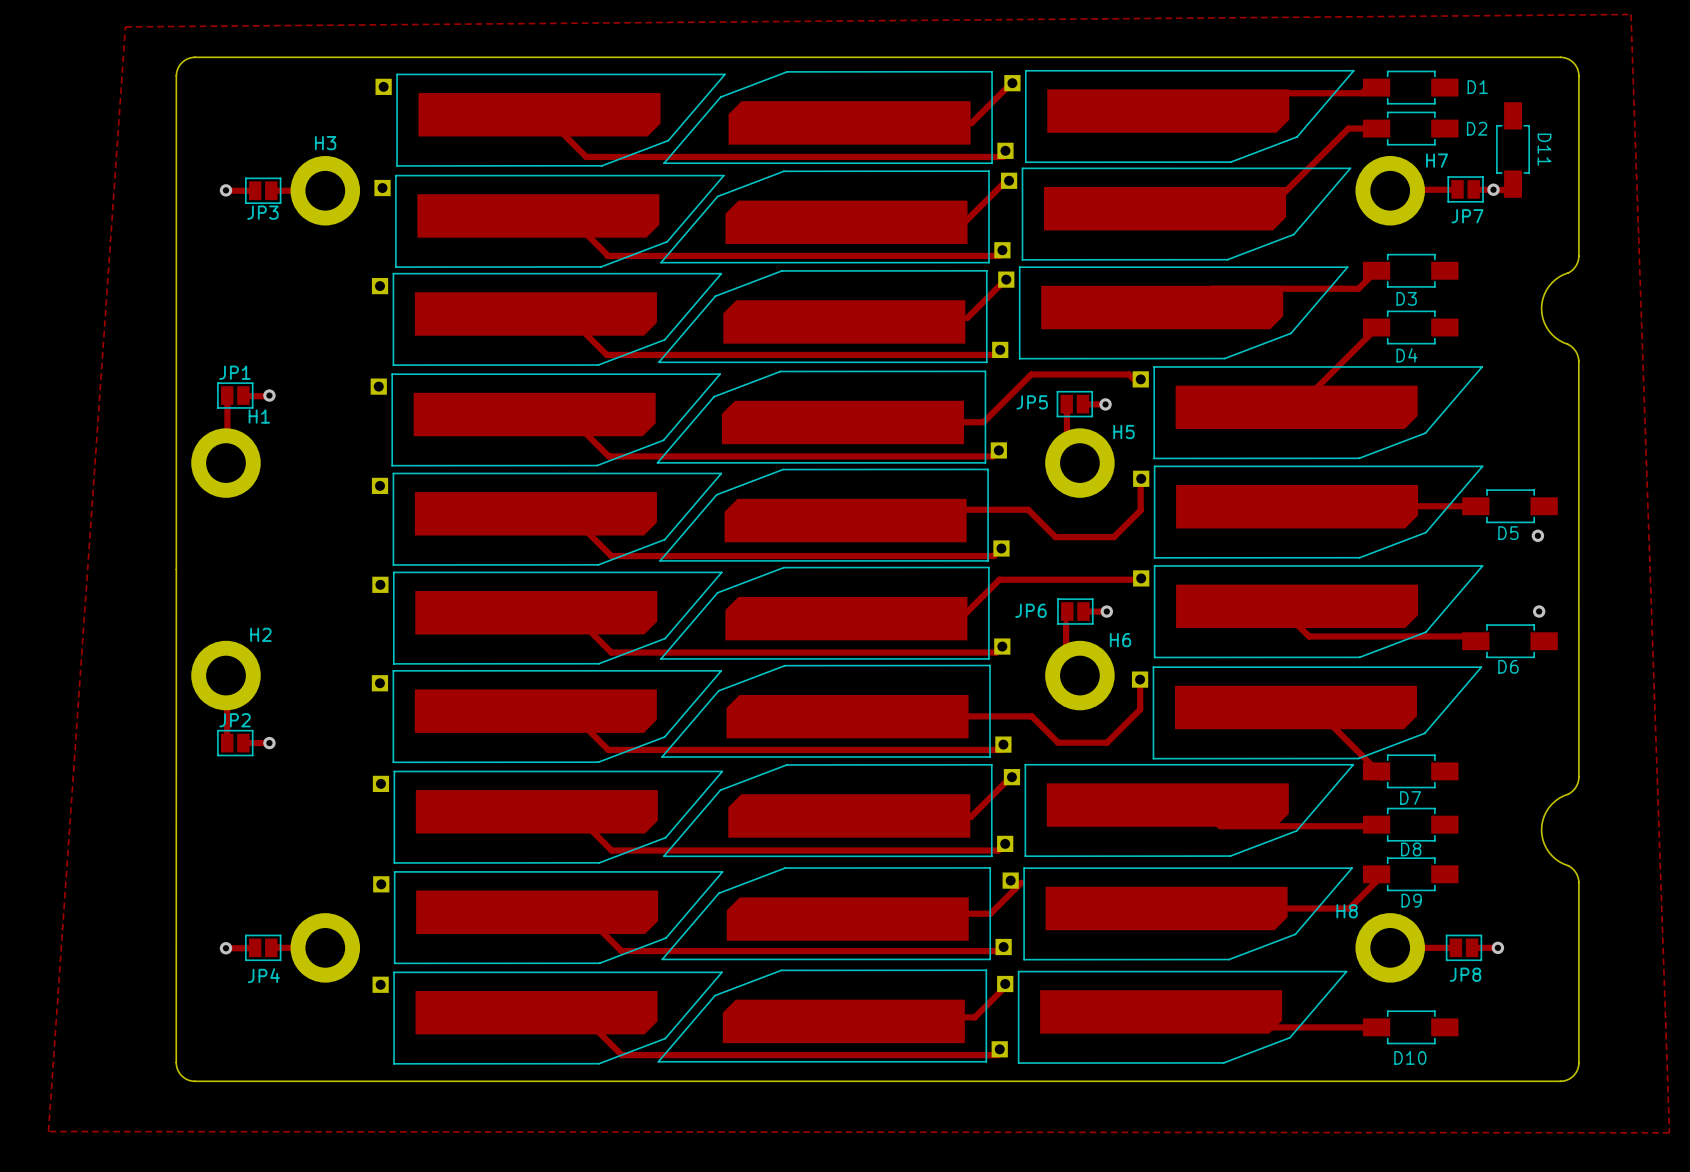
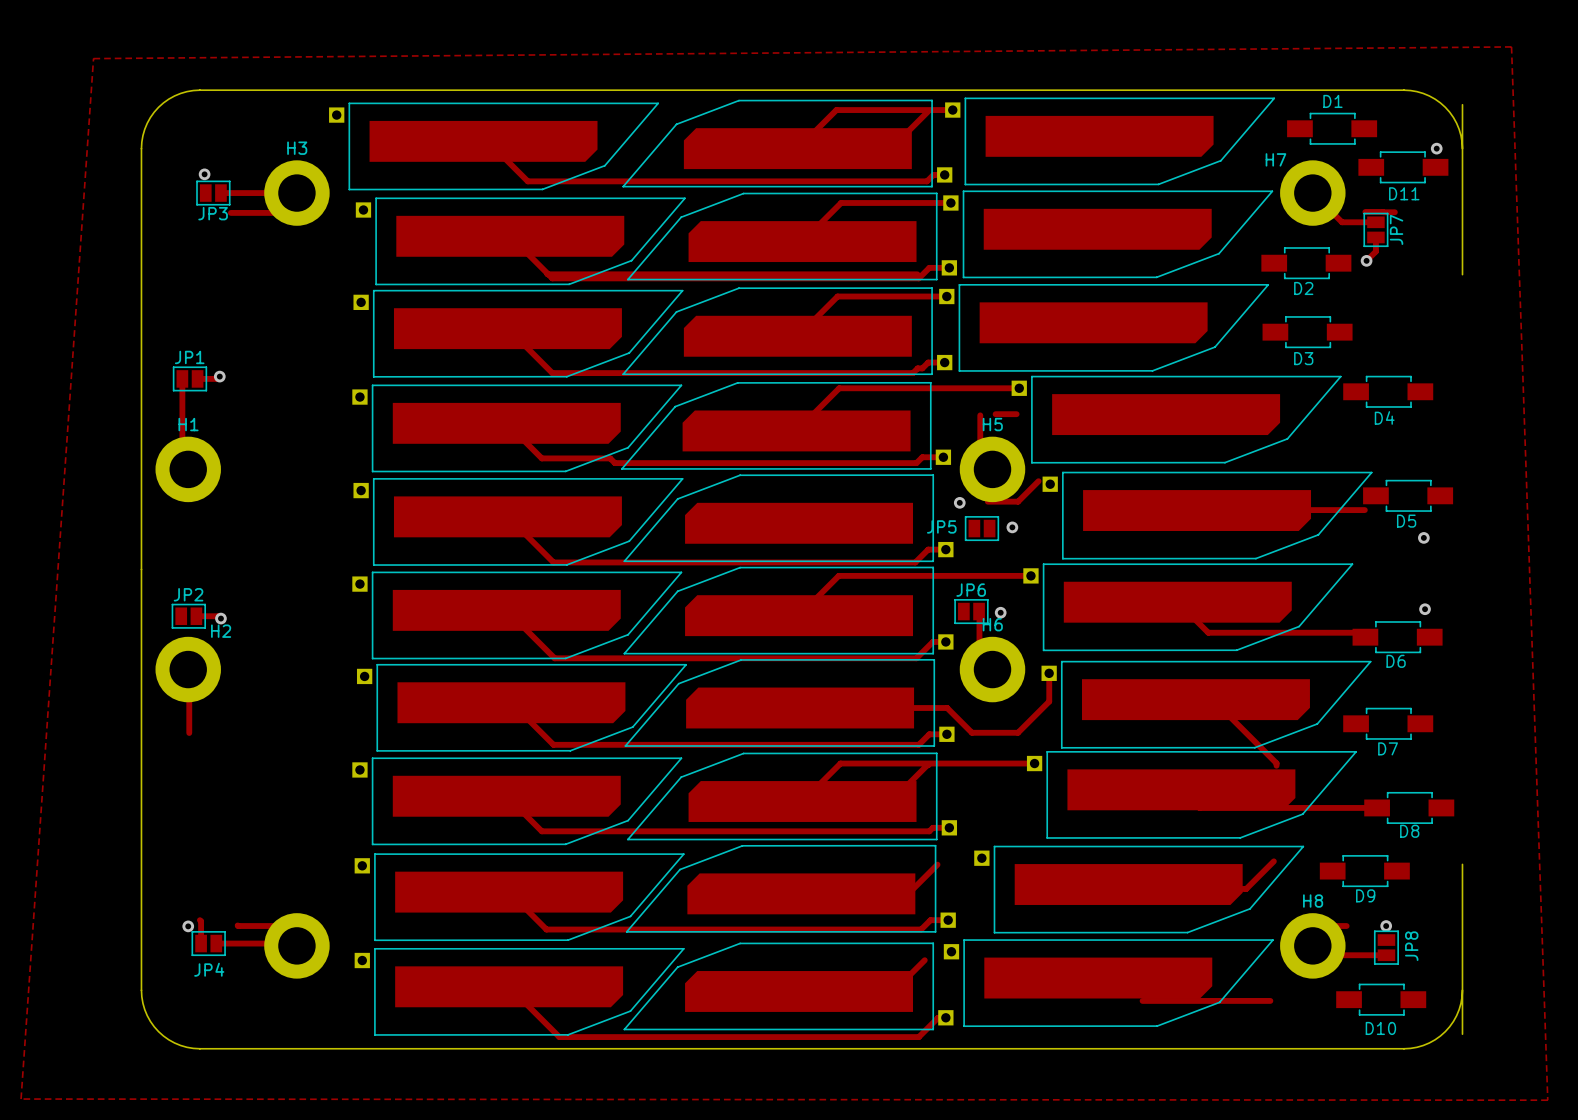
board edge: (1578, 75) (1573, 62) (1560, 57) (194, 57) (183, 61) (177, 71) (176, 122) -> (1462, 148) (1459, 129) (1445, 107) (1429, 95) (1403, 90) (199, 90) (180, 93) (158, 107) (144, 129) (141, 148)
track: none -> (952, 110) (836, 110) (797, 148)
track: (1367, 87) (1361, 93) (1236, 93) (1214, 115) -> none
D1 position: (1410, 87) -> (1332, 128)
D1 name position: D1 (1477, 87) -> D1 (1332, 101)
part position: (1179, 116) -> (1109, 141)
part position: (838, 117) -> (787, 143)
via: none -> (1436, 148)
track: (1367, 128) (1348, 128) (1268, 208) (1164, 208) -> none
D2 position: (1410, 128) -> (1306, 263)
D2 name position: D2 (1477, 128) -> D2 (1303, 288)
D11 name position: D11 (1544, 149) -> D11 (1404, 193)
D11 rotation: 0° (1513, 150) -> 90° counterclockwise (1403, 167)
track: (1008, 151) (1002, 156) (586, 156) -> (944, 174) (933, 174) (927, 181) (527, 181)
H7 name position: H7 (1437, 160) -> H7 (1275, 159)
track: none -> (220, 193) (296, 193)
track: none -> (1312, 193) (1342, 222) (1375, 222)
track: (1006, 180) (964, 222) -> none
track: none -> (950, 202) (841, 202) (802, 241)
track: (1402, 189) (1459, 189) -> none
JP7 rotation: 0° (1465, 189) -> 90° clockwise (1375, 229)
JP7 position: (1465, 189) -> (1375, 229)
via: (1493, 189) -> none
track: (225, 190) (255, 190) -> none
via position: (225, 190) -> (204, 174)
JP3 position: (263, 190) -> (213, 193)
H3 position: (325, 190) -> (296, 193)
H7 position: (1390, 190) -> (1312, 193)
part position: (1176, 214) -> (1108, 234)
part position: (835, 216) -> (792, 236)
JP7 name position: JP7 (1467, 216) -> JP7 (1396, 229)
track: none -> (1375, 237) (1375, 251) (1366, 260)
part position: (549, 221) -> (520, 241)
via: none -> (1366, 260)
track: none -> (949, 267) (929, 267) (918, 278) (552, 278) (547, 273)
board edge: (1578, 256) (1575, 266) (1568, 273) -> none
track: (1376, 270) (1358, 288) (1211, 288) (1187, 313) -> none
D3 position: (1410, 270) -> (1307, 332)
board edge: (1568, 272) (1555, 279) (1549, 286) (1542, 299) (1541, 308) (1542, 317) (1548, 330) (1559, 340) (1573, 347) (1578, 361) (1578, 777) (1573, 790) (1555, 800) (1549, 807) (1544, 815) (1541, 829) (1544, 843) (1549, 852) (1555, 859) (1573, 869) (1578, 882) -> none
track: (1005, 279) (967, 318) -> none
track: none -> (946, 296) (837, 296) (797, 336)
part position: (1173, 312) -> (1104, 327)
part position: (833, 316) -> (787, 331)
part position: (546, 319) -> (518, 333)
track: (1376, 327) (1290, 414) (1273, 414) -> none
D4 position: (1410, 327) -> (1388, 391)
track: (606, 354) (998, 354) -> (546, 367) (552, 373) (913, 373) (928, 362) (944, 362)
track: none -> (219, 376) (217, 378) (197, 378)
track: none -> (182, 378) (182, 449) (188, 454)
track: none -> (1019, 388) (839, 388) (796, 430)
track: (1135, 381) (1128, 374) (1031, 374) (983, 422) (958, 422) -> none
track: (227, 395) (227, 433) -> none
JP1 position: (235, 395) -> (189, 378)
via position: (269, 395) -> (219, 376)
track: (244, 396) (268, 396) -> none
JP5 position: (1074, 404) -> (981, 528)
via: (1105, 404) -> none
part position: (1307, 412) -> (1176, 419)
track: (534, 414) (566, 414) (608, 456) (992, 456) (998, 450) -> none
track: none -> (506, 423) (541, 458) (610, 458) (614, 463) (916, 463) (922, 457) (943, 457)
H1 name position: H1 (259, 416) -> H1 (188, 424)
part position: (831, 417) -> (786, 425)
part position: (545, 419) -> (517, 428)
H5 name position: H5 (1123, 432) -> H5 (992, 424)
track: none -> (1038, 481) (1018, 501) (987, 501)
track: (1140, 483) (1140, 510) (1113, 537) (1055, 537) (1028, 509) (876, 509) -> none
via: none -> (959, 502)
D5 position: (1509, 506) -> (1408, 495)
track: (535, 513) (569, 513) (611, 556) (993, 556) (1001, 548) -> none
track: none -> (507, 516) (553, 562) (915, 562) (928, 549) (945, 549)
part position: (834, 515) -> (788, 518)
part position: (546, 519) -> (518, 521)
via: none -> (1012, 527)
board edge: (176, 569) (176, 1062) (179, 1072) (188, 1080) (1560, 1081) (1573, 1075) (1578, 1062) -> (141, 569) (141, 996) (144, 1009) (154, 1026) (163, 1036) (180, 1045) (199, 1048) (1403, 1048) (1429, 1042) (1445, 1031) (1459, 1009) (1462, 990)
track: none -> (1030, 575) (838, 575) (799, 615)
track: (1140, 579) (999, 579) (960, 618) -> none
JP6 name position: JP6 (1030, 610) -> JP6 (971, 590)
JP6 position: (1075, 611) -> (971, 611)
track: (1083, 611) (1104, 611) -> none
via position: (1106, 611) -> (1000, 612)
part position: (1308, 611) -> (1188, 607)
track: (564, 612) (571, 612) (611, 652) (996, 652) (1002, 646) -> (506, 610) (554, 658) (916, 658) (932, 641) (945, 641)
part position: (835, 613) -> (788, 610)
track: none -> (196, 616) (218, 616) (220, 618)
part position: (547, 618) -> (517, 615)
via: none -> (220, 618)
H6 name position: H6 (1120, 640) -> H6 (992, 624)
part position: (836, 711) -> (789, 702)
part position: (546, 716) -> (521, 707)
JP2 position: (235, 743) -> (188, 616)
track: (243, 743) (269, 743) -> none
via: (269, 743) -> none
track: (1006, 744) (1001, 749) (608, 749) -> (946, 734) (929, 734) (918, 744) (553, 744) (548, 739)
D7 position: (1410, 771) -> (1388, 723)
track: none -> (1034, 763) (840, 763) (802, 801)
track: none -> (1181, 789) (1199, 807) (1377, 807)
track: (1167, 805) (1183, 789) (1220, 826) (1378, 826) -> none
part: none -> (1191, 794)
track: none -> (506, 796) (541, 831) (929, 831) (932, 827) (949, 827)
part position: (838, 810) -> (792, 796)
part: (1178, 810) -> none
track: (536, 811) (573, 811) (611, 850) (998, 850) (1005, 843) -> none
part position: (547, 817) -> (517, 801)
D8 position: (1410, 824) -> (1409, 807)
D9 position: (1410, 874) -> (1364, 871)
part: none -> (1139, 889)
track: none -> (509, 892) (546, 929) (921, 929) (930, 920) (948, 920)
track: (598, 911) (598, 928) (621, 951) (1003, 951) -> none
H8 name position: H8 (1347, 911) -> H8 (1313, 901)
part position: (836, 913) -> (790, 888)
part: (1177, 913) -> none
part position: (548, 917) -> (519, 897)
track: none -> (199, 920) (201, 943)
JP4 position: (263, 947) -> (208, 943)
part position: (325, 947) -> (296, 945)
H8 position: (1390, 947) -> (1312, 945)
JP8 rotation: 0° (1463, 947) -> 90° clockwise (1386, 947)
JP8 position: (1463, 947) -> (1386, 947)
track: (1477, 947) (1497, 947) -> none
track: (225, 948) (254, 948) -> none
track: none -> (216, 943) (294, 943) (296, 945)
track: none -> (1312, 945) (1322, 955) (1386, 955)
JP8 name position: JP8 (1465, 974) -> JP8 (1411, 946)
track: none -> (509, 986) (559, 1037) (918, 1037) (938, 1017) (945, 1017)
track: (597, 1012) (597, 1030) (621, 1055) (997, 1055) (1003, 1049) -> none
part position: (832, 1016) -> (788, 986)
part position: (1172, 1017) -> (1108, 983)
part position: (547, 1018) -> (519, 991)
D10 position: (1410, 1027) -> (1381, 999)

